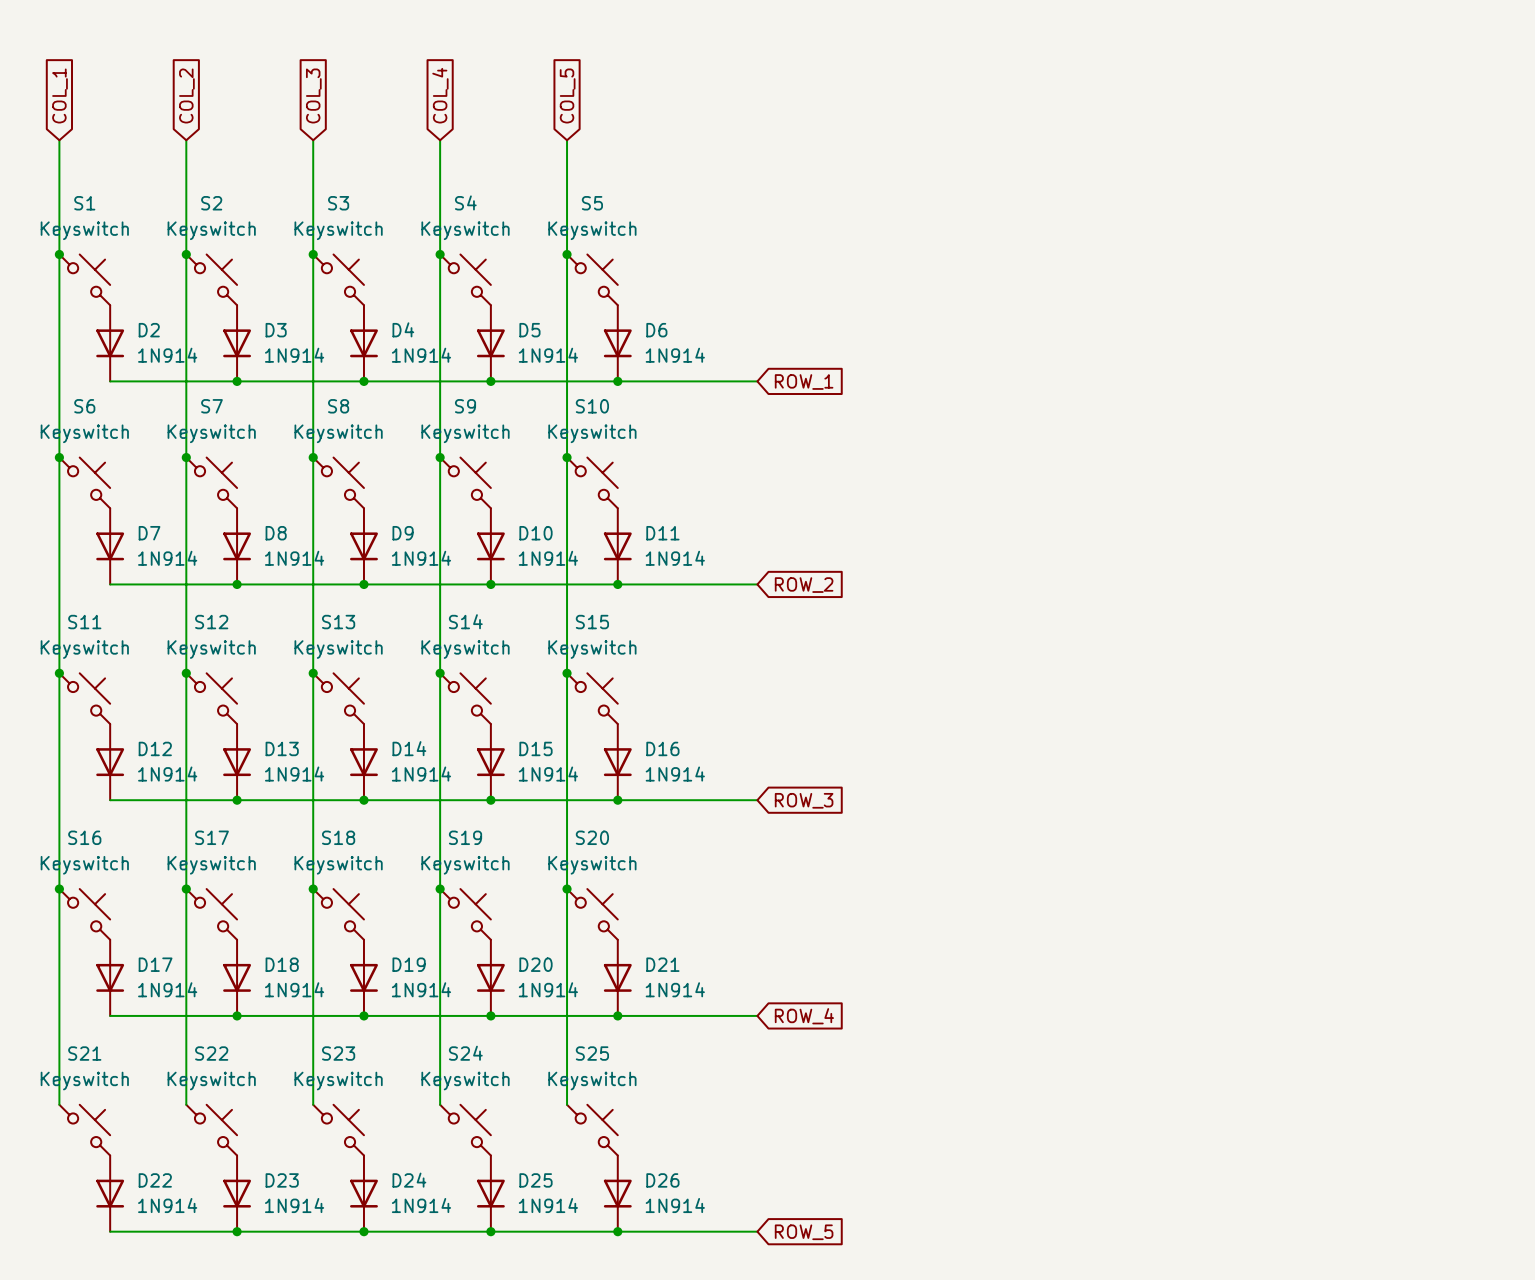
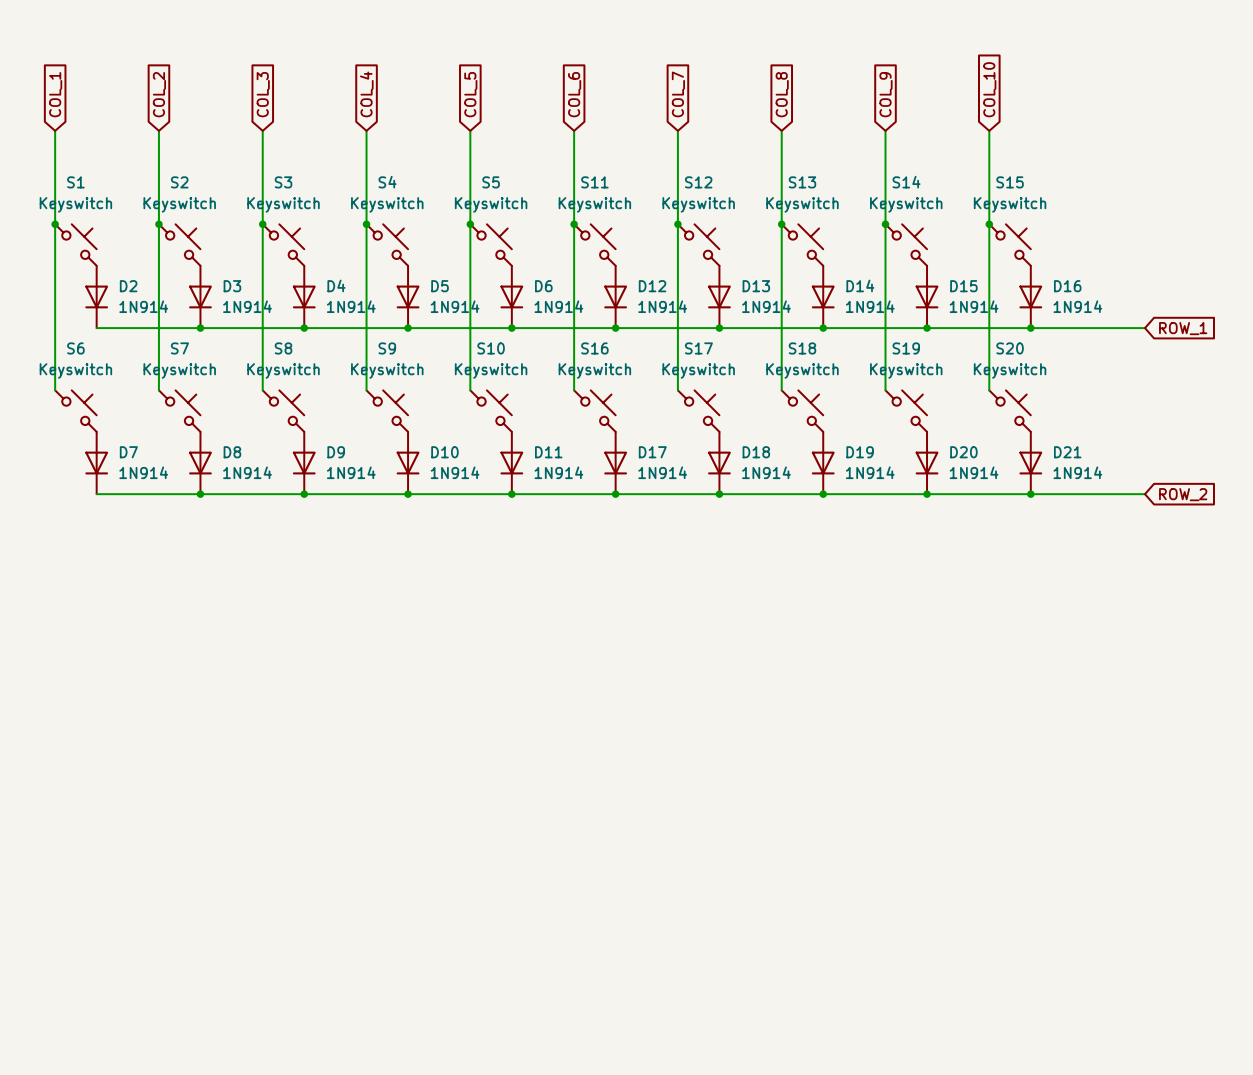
global label: none -> COL_10 (989, 89)
global label: none -> COL_6 (574, 94)
global label: none -> COL_7 (678, 94)
global label: none -> COL_8 (782, 94)
global label: none -> COL_9 (886, 94)
wire: none -> (574, 130) (574, 390)
wire: none -> (677, 130) (677, 390)
wire: none -> (781, 130) (781, 390)
wire: none -> (885, 130) (885, 390)
wire: none -> (989, 130) (989, 390)
junction: none -> (574, 224)
junction: none -> (677, 224)
junction: none -> (781, 224)
junction: none -> (885, 224)
junction: none -> (989, 224)
junction: none -> (615, 328)
wire: none -> (626, 328) (1144, 328)
junction: none -> (719, 328)
junction: none -> (823, 328)
junction: none -> (927, 328)
junction: none -> (1030, 328)
global label: ROW_1 (804, 382) -> none
global label: none -> ROW_1 (1183, 328)
wire: (59, 457) (59, 1104) -> none
junction: (59, 457) -> none
wire: (186, 457) (186, 1104) -> none
junction: (186, 457) -> none
wire: (313, 457) (313, 1104) -> none
junction: (313, 457) -> none
wire: (440, 457) (440, 1104) -> none
junction: (440, 457) -> none
wire: (567, 457) (567, 1104) -> none
junction: (567, 457) -> none
junction: none -> (615, 494)
wire: none -> (626, 494) (1144, 494)
junction: none -> (719, 494)
junction: none -> (823, 494)
junction: none -> (927, 494)
junction: none -> (1030, 494)
global label: ROW_2 (804, 585) -> none
global label: none -> ROW_2 (1183, 494)
junction: (59, 673) -> none
junction: (186, 673) -> none
junction: (313, 673) -> none
junction: (440, 673) -> none
junction: (567, 673) -> none
S11 position: (84, 698) -> (594, 245)
S12 position: (211, 698) -> (698, 245)
S13 position: (338, 698) -> (802, 245)
S14 position: (465, 698) -> (906, 245)
S15 position: (592, 698) -> (1010, 245)
D12 position: (110, 762) -> (615, 296)
D13 position: (237, 762) -> (719, 296)
D14 position: (363, 762) -> (823, 296)
D15 position: (490, 762) -> (927, 296)
D16 position: (617, 762) -> (1030, 296)
wire: (110, 800) (757, 800) -> none
junction: (237, 800) -> none
junction: (363, 800) -> none
junction: (490, 800) -> none
junction: (617, 800) -> none
global label: ROW_3 (804, 800) -> none
junction: (59, 889) -> none
junction: (186, 889) -> none
junction: (313, 889) -> none
junction: (440, 889) -> none
junction: (567, 889) -> none
S16 position: (84, 914) -> (594, 411)
S17 position: (211, 914) -> (698, 411)
S18 position: (338, 914) -> (802, 411)
S19 position: (465, 914) -> (906, 411)
S20 position: (592, 914) -> (1010, 411)
D17 position: (110, 977) -> (615, 463)
D18 position: (237, 977) -> (719, 463)
D19 position: (363, 977) -> (823, 463)
D20 position: (490, 977) -> (927, 463)
D21 position: (617, 977) -> (1030, 463)
wire: (110, 1015) (757, 1015) -> none
junction: (237, 1015) -> none
junction: (363, 1015) -> none
junction: (490, 1015) -> none
junction: (617, 1015) -> none
global label: ROW_4 (804, 1016) -> none
S21: Keyswitch (84, 1130) -> none
S22: Keyswitch (211, 1130) -> none
S23: Keyswitch (338, 1130) -> none
S24: Keyswitch (465, 1130) -> none
S25: Keyswitch (592, 1130) -> none
D22: 1N914 (110, 1193) -> none
D23: 1N914 (237, 1193) -> none
D24: 1N914 (363, 1193) -> none
D25: 1N914 (490, 1193) -> none
D26: 1N914 (617, 1193) -> none
wire: (110, 1231) (757, 1231) -> none
junction: (237, 1231) -> none
junction: (363, 1231) -> none
junction: (490, 1231) -> none
junction: (617, 1231) -> none
global label: ROW_5 (804, 1232) -> none

